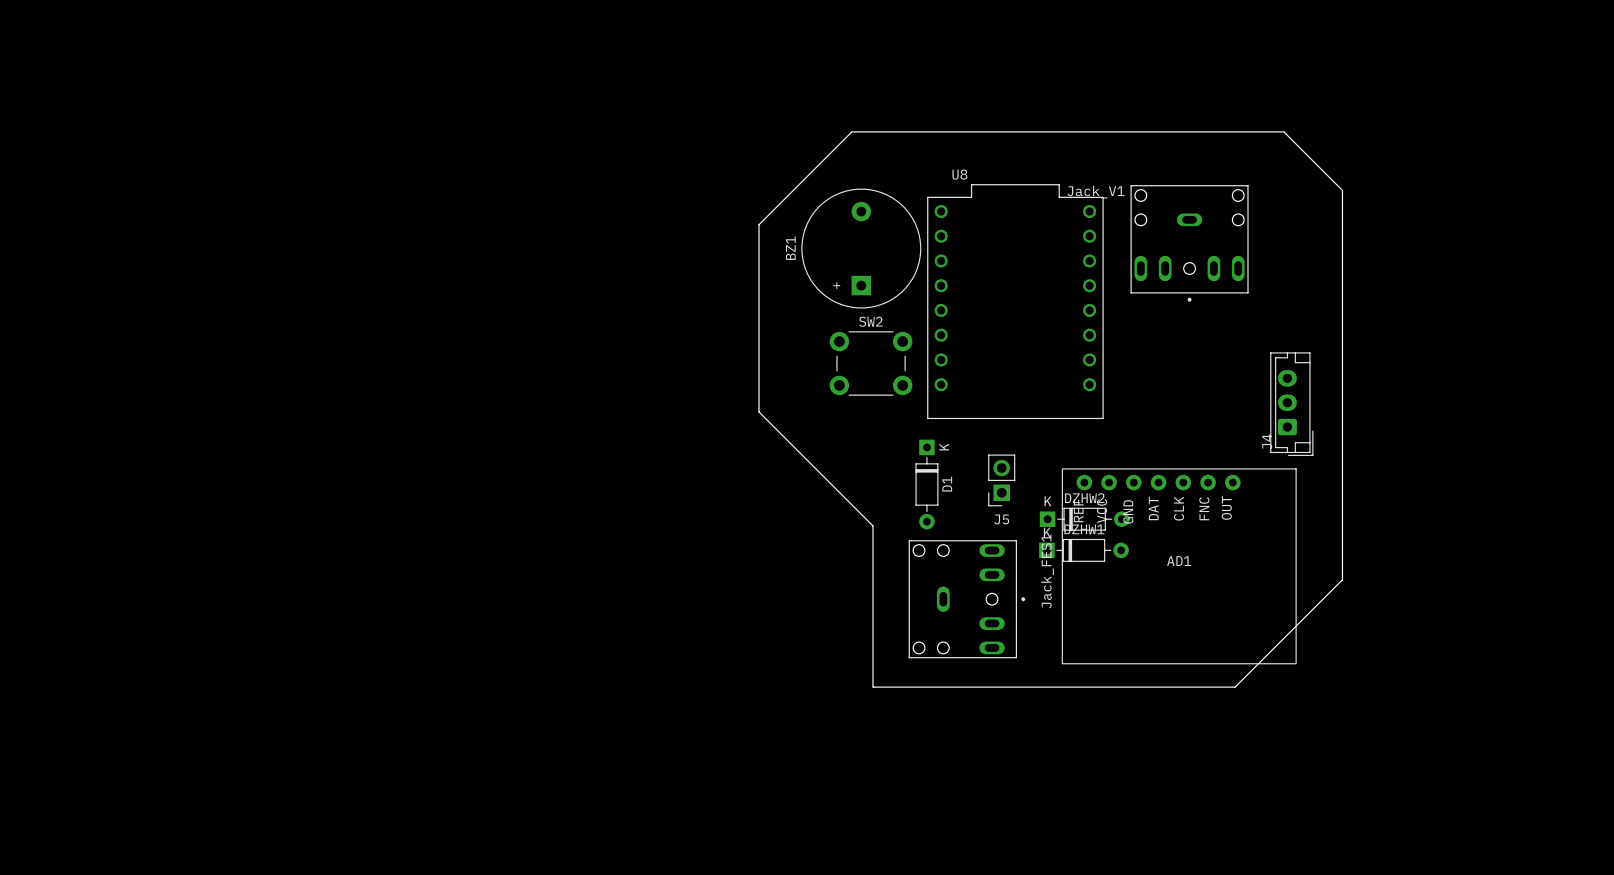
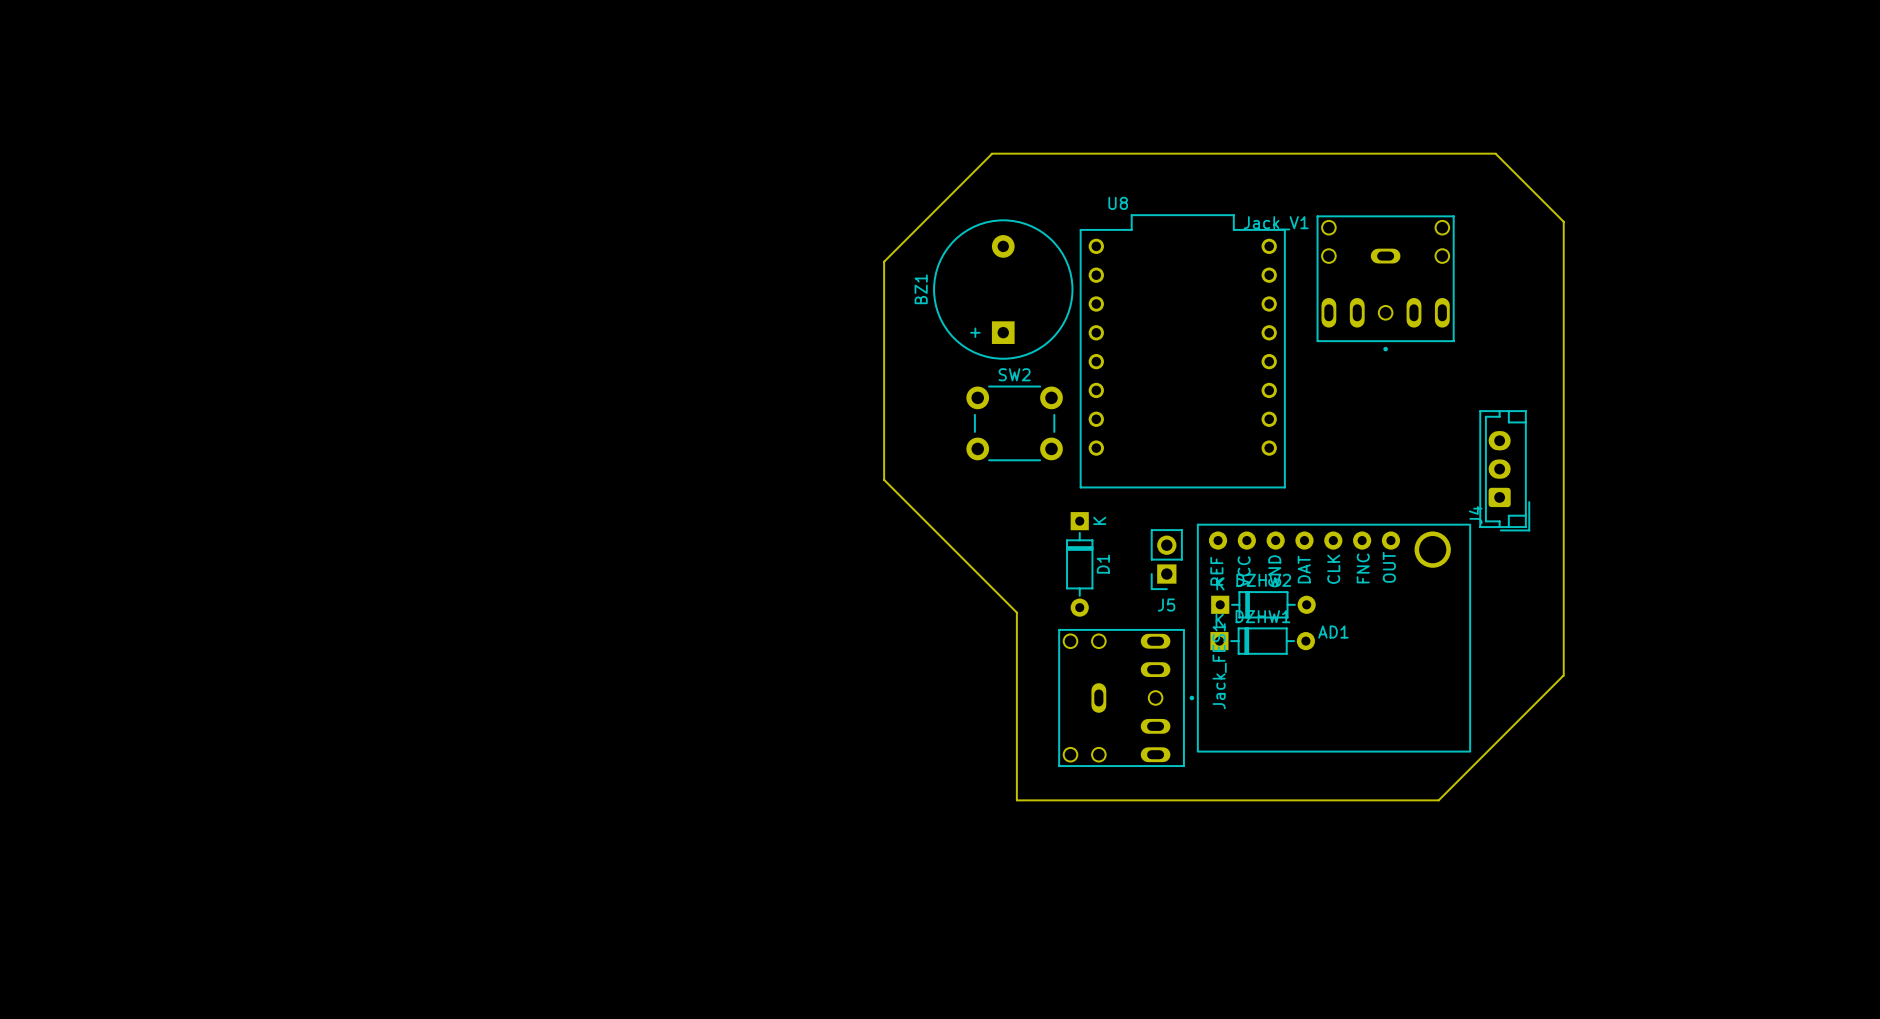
AD1 footprint: [1061, 468, 1297, 665] -> [1197, 524, 1471, 753]

